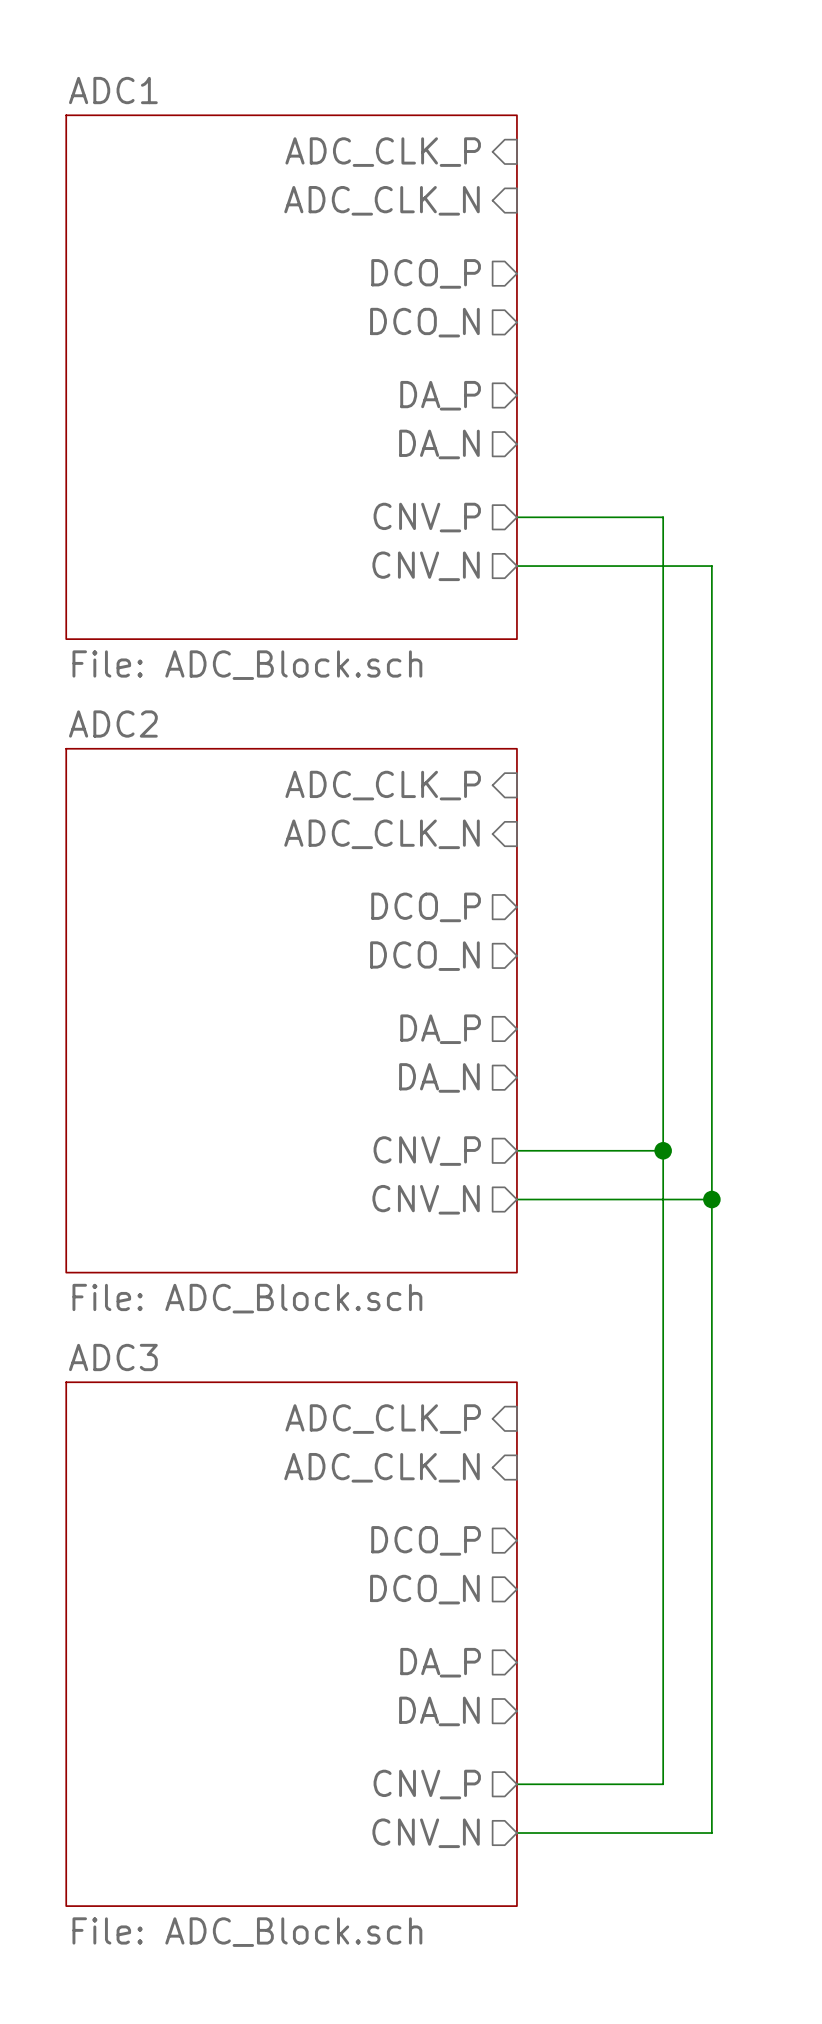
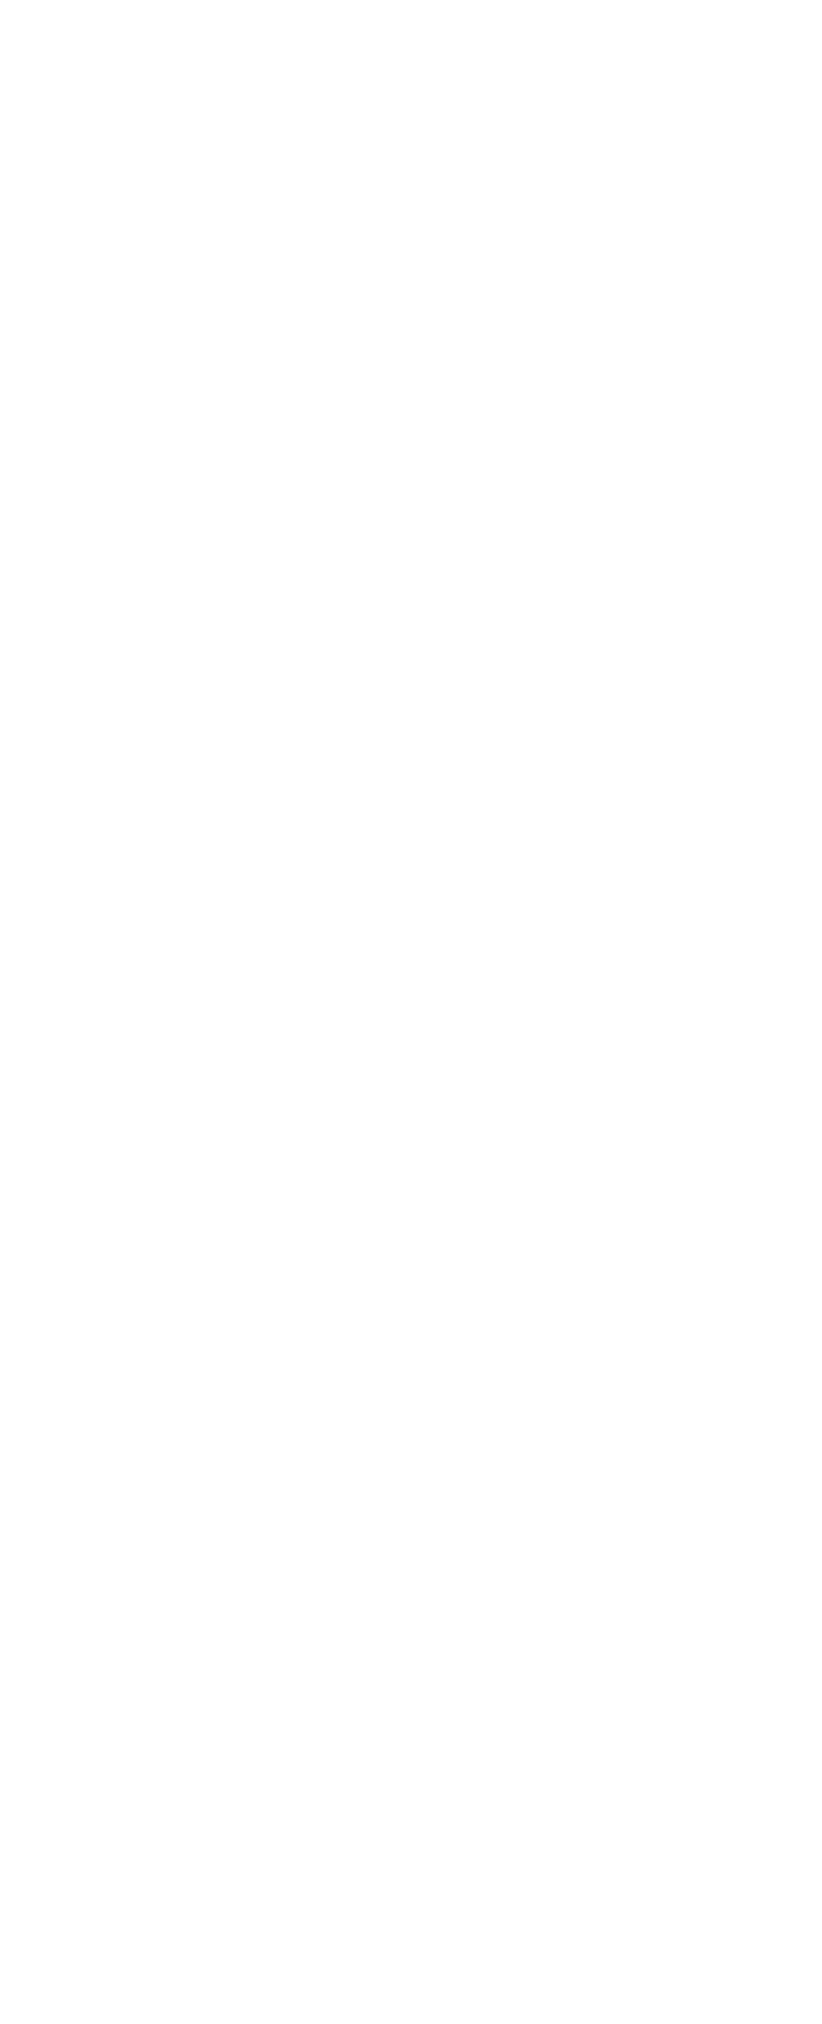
sheet pin: ADC_CLK_P (383, 152) -> none
sheet pin: ADC_CLK_N (382, 200) -> none
sheet pin: DCO_P (426, 273) -> none
sheet pin: DCO_N (424, 322) -> none
sheet ADC1: File: ADC_Block.sch (291, 377) -> none
sheet pin: DA_P (440, 395) -> none
sheet pin: DA_N (439, 444) -> none
sheet pin: CNV_P (427, 517) -> none
wire: (516, 517) (663, 517) (663, 1784) (516, 1784) -> none
sheet pin: CNV_N (426, 566) -> none
wire: (516, 566) (711, 566) (711, 1833) (516, 1833) -> none
sheet pin: ADC_CLK_P (383, 785) -> none
sheet pin: ADC_CLK_N (382, 834) -> none
sheet pin: DCO_P (426, 907) -> none
sheet pin: DCO_N (424, 956) -> none
sheet ADC2: File: ADC_Block.sch (291, 1010) -> none
sheet pin: DA_P (440, 1029) -> none
sheet pin: DA_N (439, 1077) -> none
wire: (516, 1150) (663, 1150) -> none
junction: (663, 1150) -> none
sheet pin: CNV_P (427, 1151) -> none
sheet pin: CNV_N (426, 1199) -> none
wire: (516, 1199) (711, 1199) -> none
junction: (711, 1199) -> none
sheet pin: ADC_CLK_P (383, 1419) -> none
sheet pin: ADC_CLK_N (382, 1467) -> none
sheet pin: DCO_P (426, 1540) -> none
sheet pin: DCO_N (424, 1589) -> none
sheet ADC3: File: ADC_Block.sch (291, 1644) -> none
sheet pin: DA_P (440, 1662) -> none
sheet pin: DA_N (439, 1711) -> none
sheet pin: CNV_P (427, 1784) -> none
sheet pin: CNV_N (426, 1833) -> none

